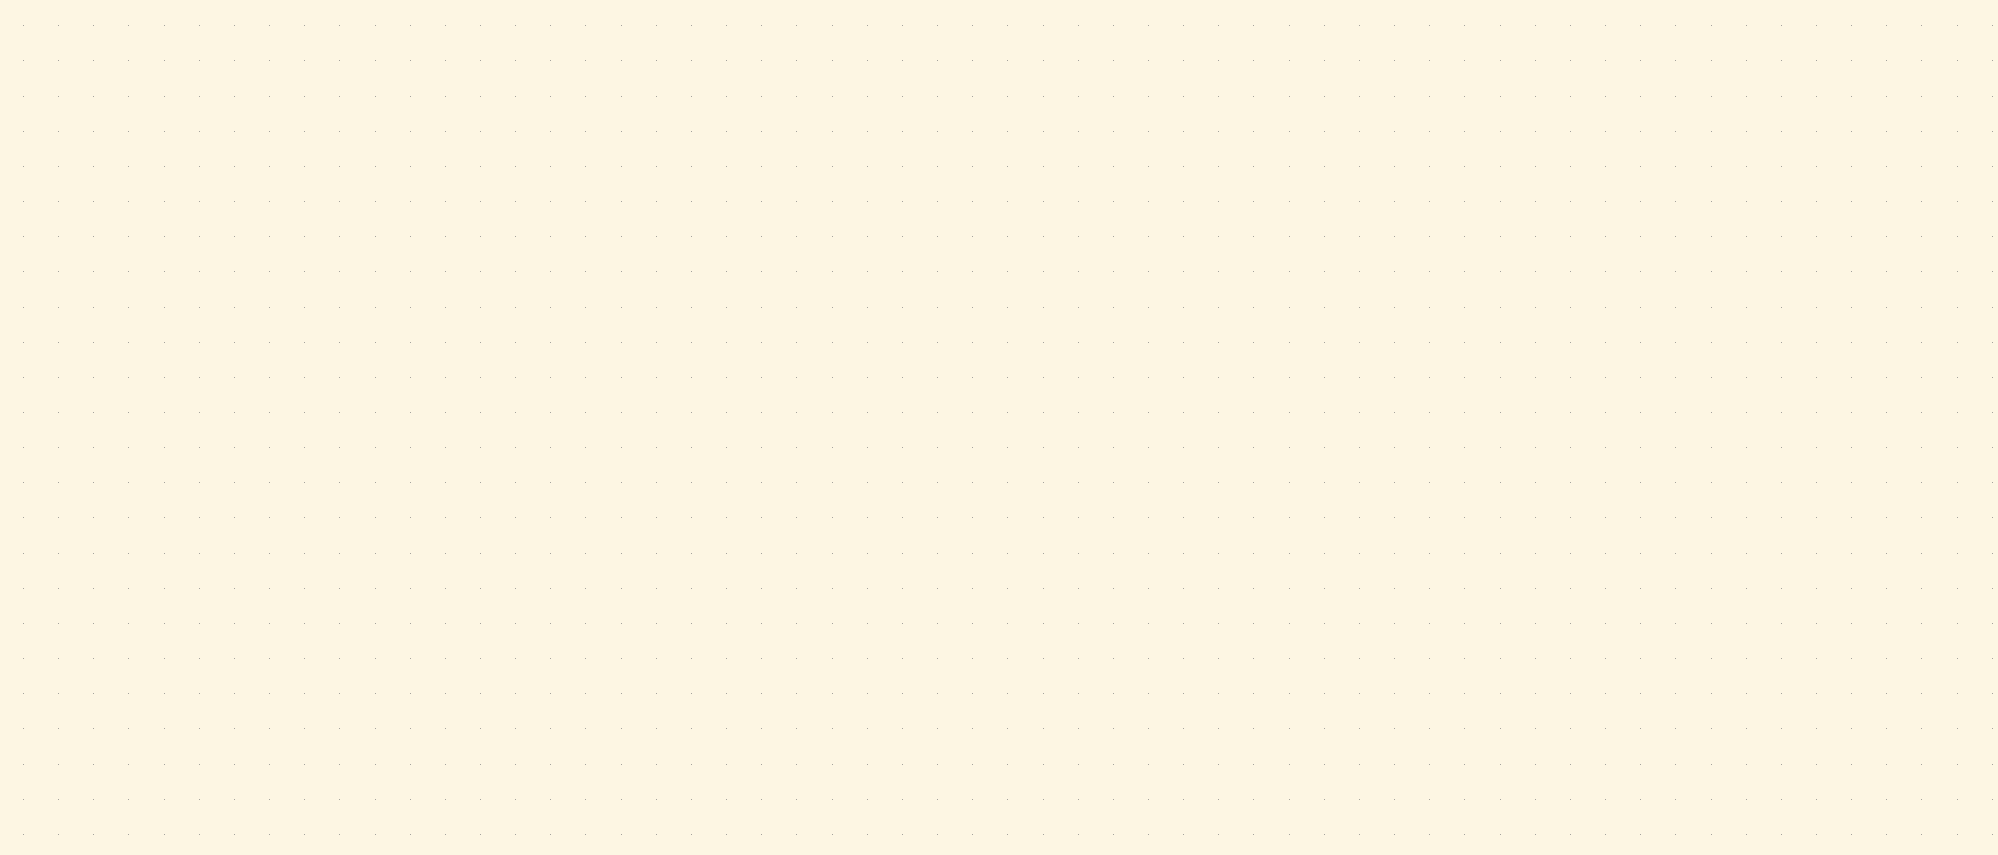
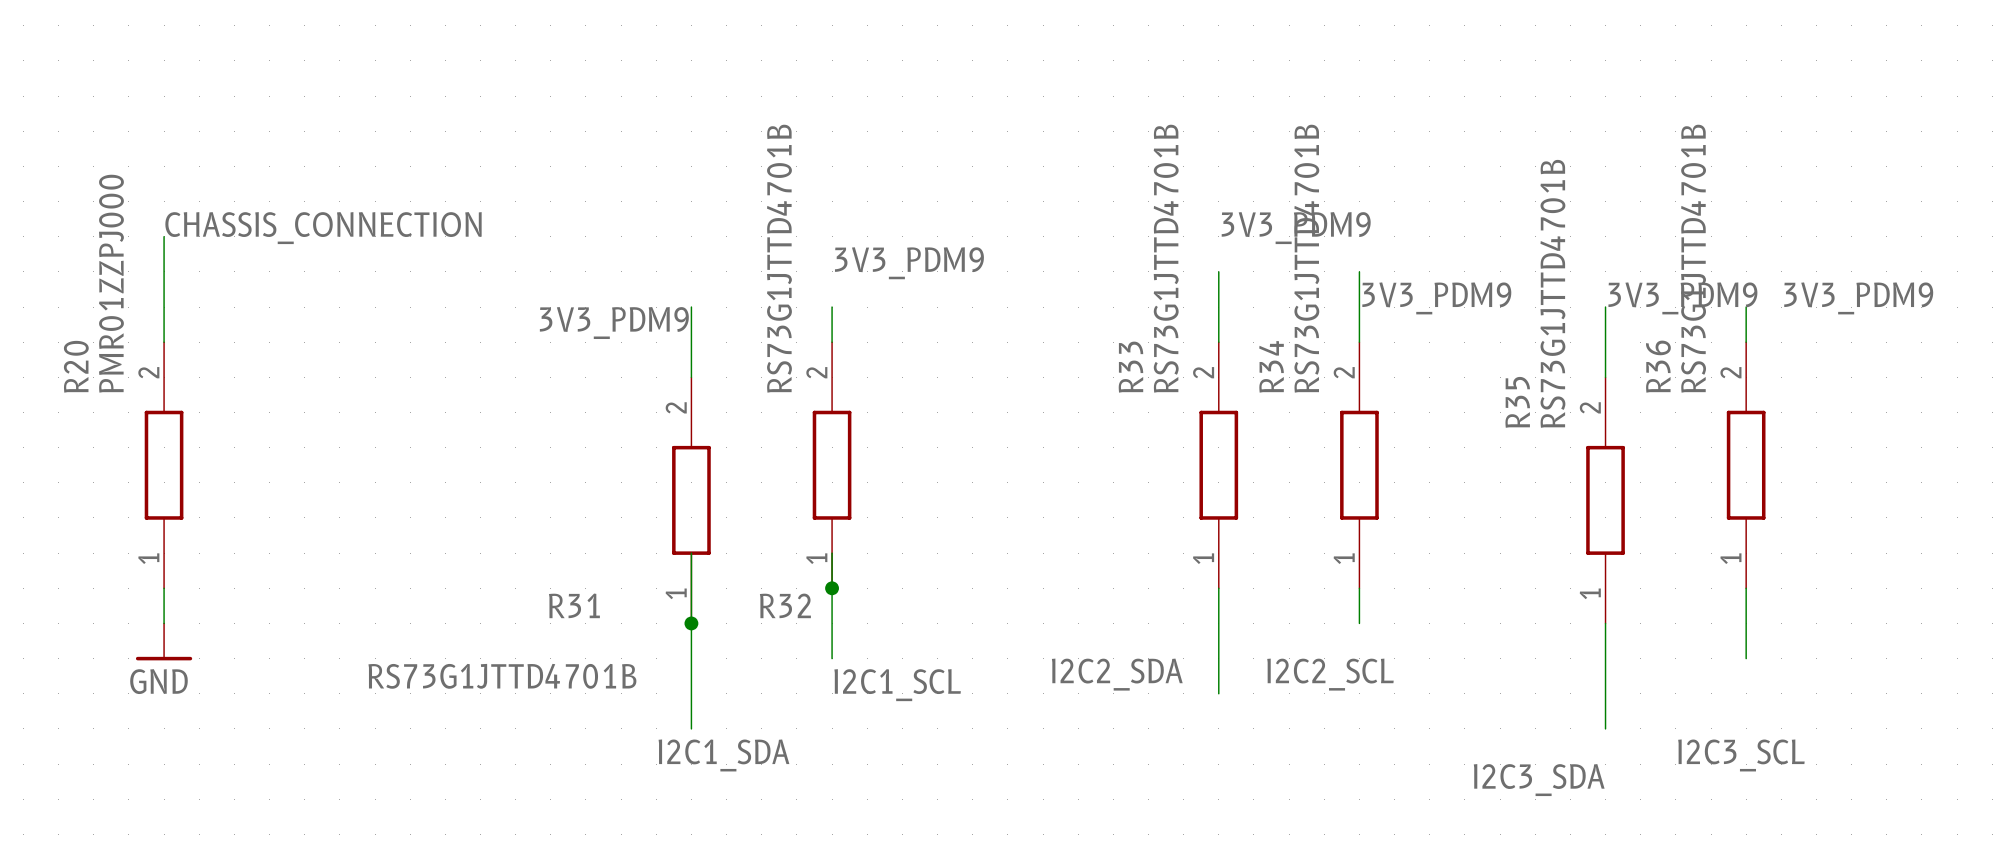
label: none -> CHASSIS_CONNECTION (323, 228)
label: none -> 3V3_PDM9 (1296, 228)
wire: none -> (164, 236) (164, 342)
label: none -> 3V3_PDM9 (909, 263)
wire: none -> (1218, 271) (1218, 342)
wire: none -> (1359, 271) (1359, 342)
label: none -> 3V3_PDM9 (1436, 298)
label: none -> 3V3_PDM9 (1682, 298)
label: none -> 3V3_PDM9 (1858, 298)
wire: none -> (691, 307) (691, 377)
wire: none -> (832, 307) (832, 342)
wire: none -> (1605, 307) (1605, 377)
wire: none -> (1746, 307) (1746, 342)
label: none -> 3V3_PDM9 (614, 323)
R20: none -> PMR01ZZPJ000 (164, 465)
R32: none -> RS73G1JTTD4701B (832, 465)
R33: none -> RS73G1JTTD4701B (1218, 465)
R34: none -> RS73G1JTTD4701B (1359, 465)
R36: none -> RS73G1JTTD4701B (1746, 465)
R31: none -> RS73G1JTTD4701B (691, 500)
R35: none -> RS73G1JTTD4701B (1605, 500)
wire: none -> (691, 553) (691, 728)
wire: none -> (832, 553) (832, 658)
wire: none -> (164, 588) (164, 623)
junction: none -> (832, 588)
wire: none -> (1218, 588) (1218, 693)
wire: none -> (1359, 588) (1359, 623)
wire: none -> (1746, 588) (1746, 658)
junction: none -> (691, 623)
wire: none -> (1605, 623) (1605, 728)
power symbol: none -> GND (164, 641)
label: none -> I2C2_SDA (1117, 674)
label: none -> I2C2_SCL (1330, 674)
label: none -> I2C1_SCL (897, 685)
label: none -> I2C1_SDA (723, 755)
label: none -> I2C3_SCL (1741, 755)
label: none -> I2C3_SDA (1539, 780)

